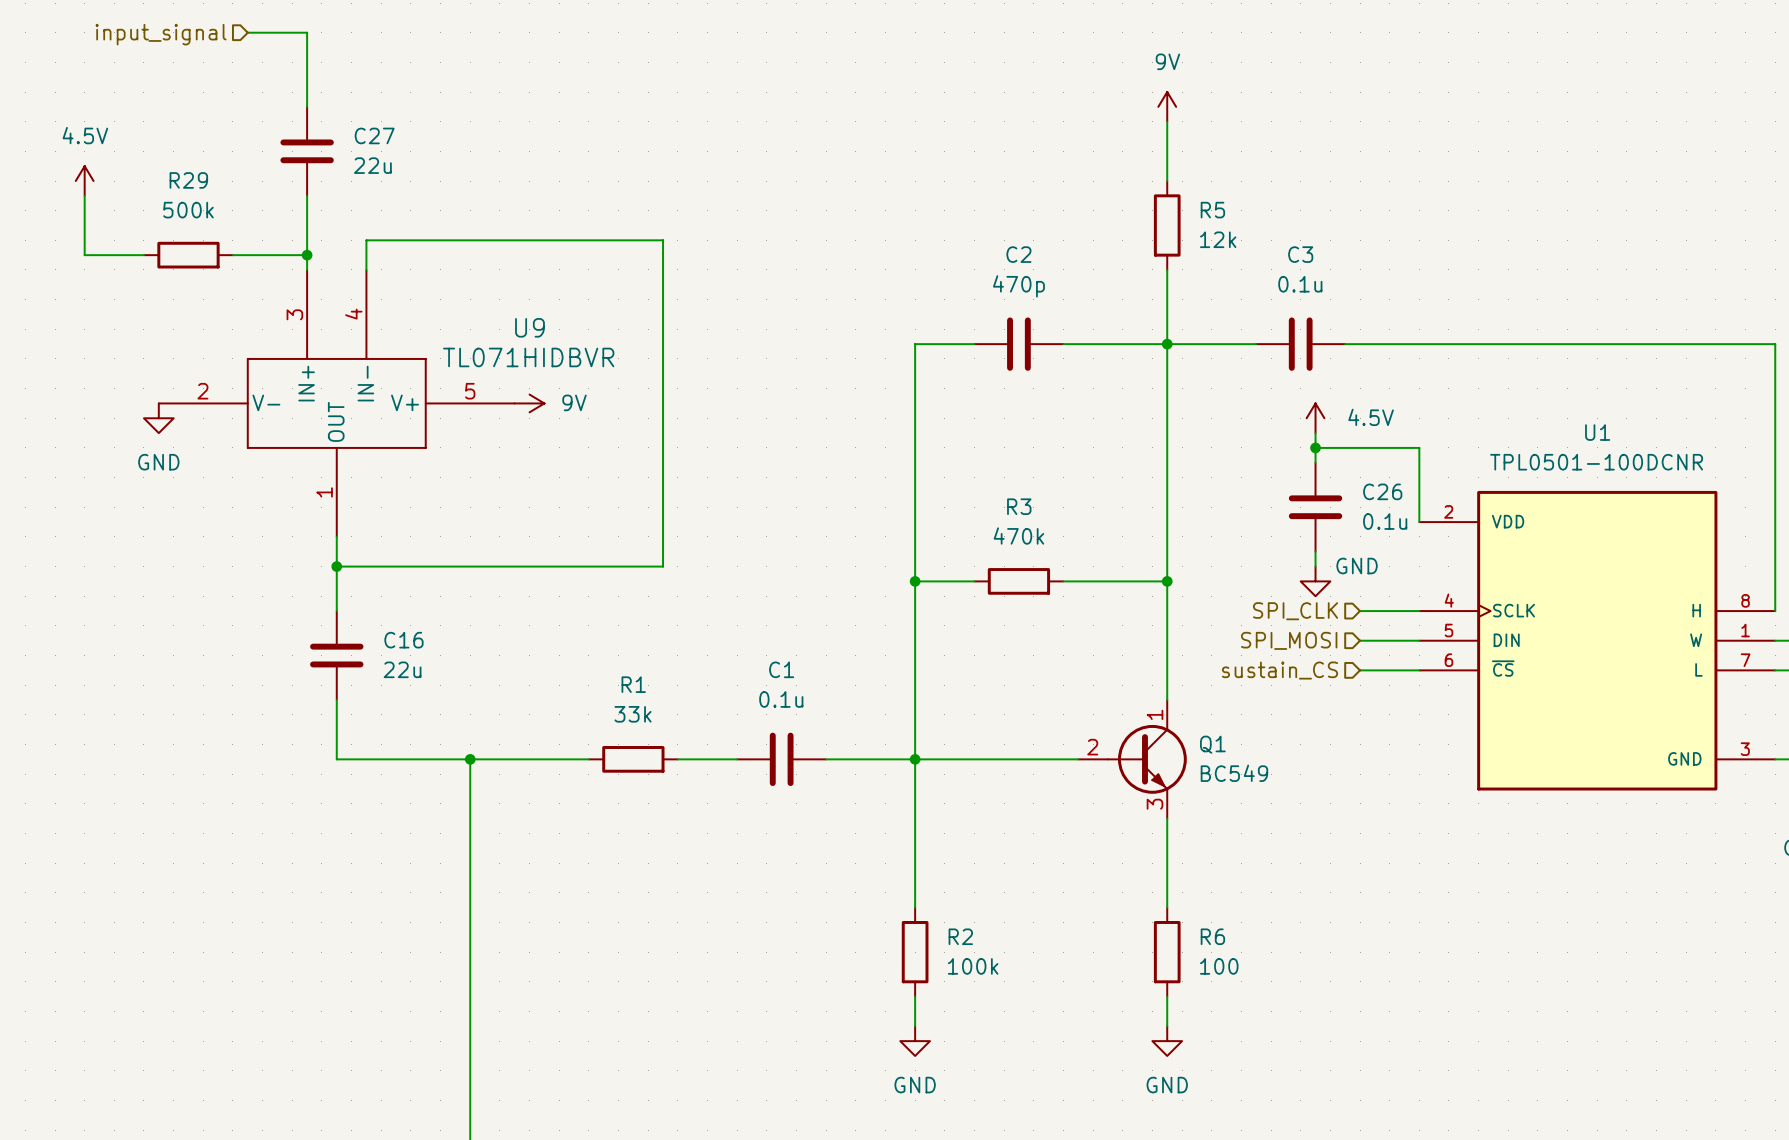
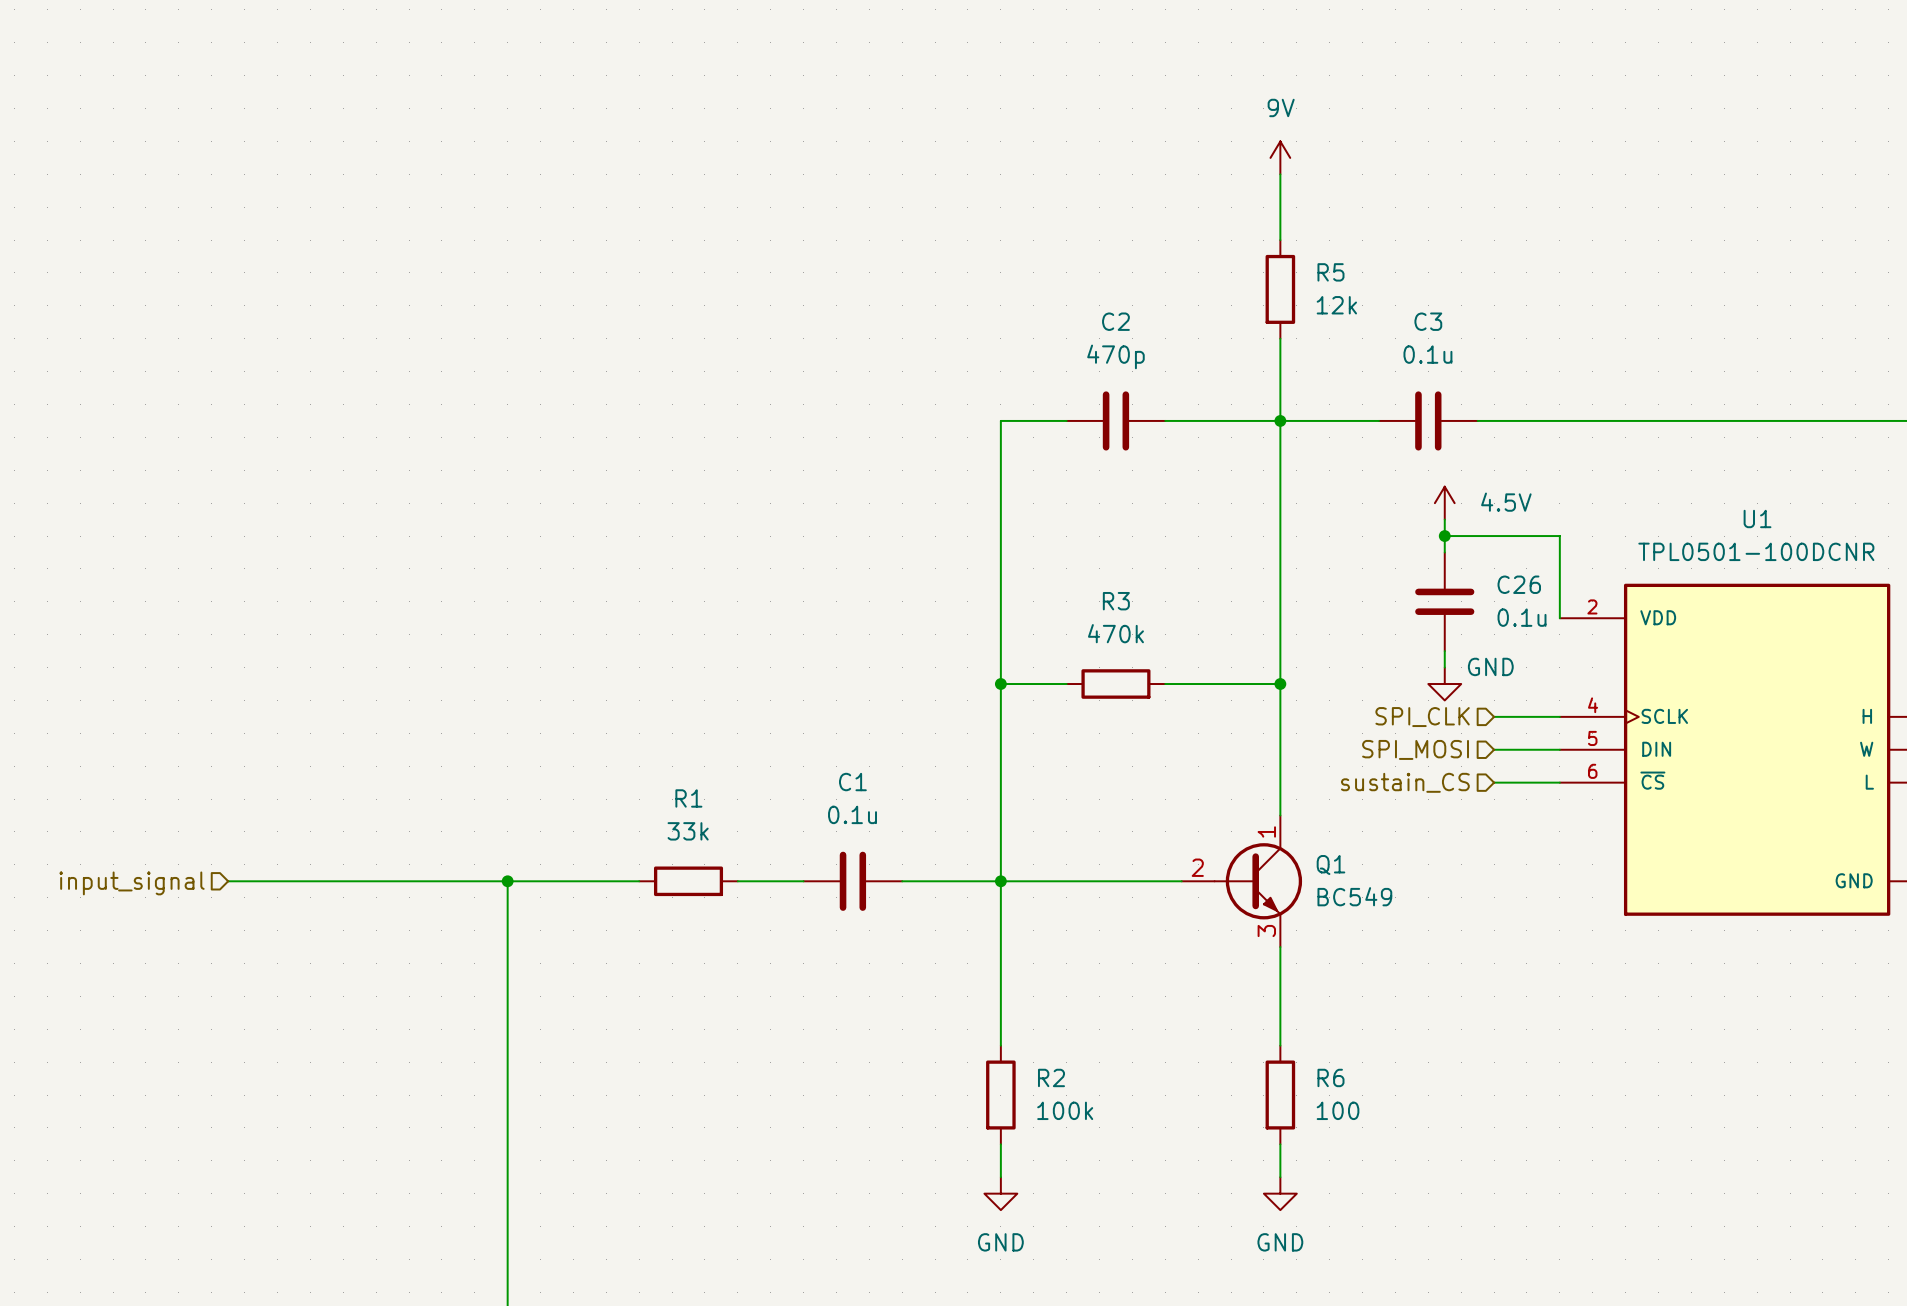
wire: (247, 32) (307, 32) (307, 106) -> none
hierarchical label: input_signal (161, 34) -> none
C27: 22u (307, 151) -> none
power symbol: 4.5V (84, 181) -> none
wire: (84, 195) (84, 255) (143, 255) -> none
wire: (307, 195) (307, 269) -> none
R29: 500k (188, 255) -> none
wire: (232, 255) (307, 255) -> none
junction: (307, 255) -> none
wire: (366, 269) (366, 240) (663, 240) (663, 566) (336, 566) -> none
U9: TL071HIDBVR (336, 403) -> none
power symbol: 9V (529, 403) -> none
power symbol: GND (158, 418) -> none
wire: (336, 536) (336, 611) -> none
junction: (336, 566) -> none
C16: 22u (336, 655) -> none
wire: (336, 700) (336, 759) -> (228, 881) (359, 881)
hierarchical label: none -> input_signal (132, 883)

